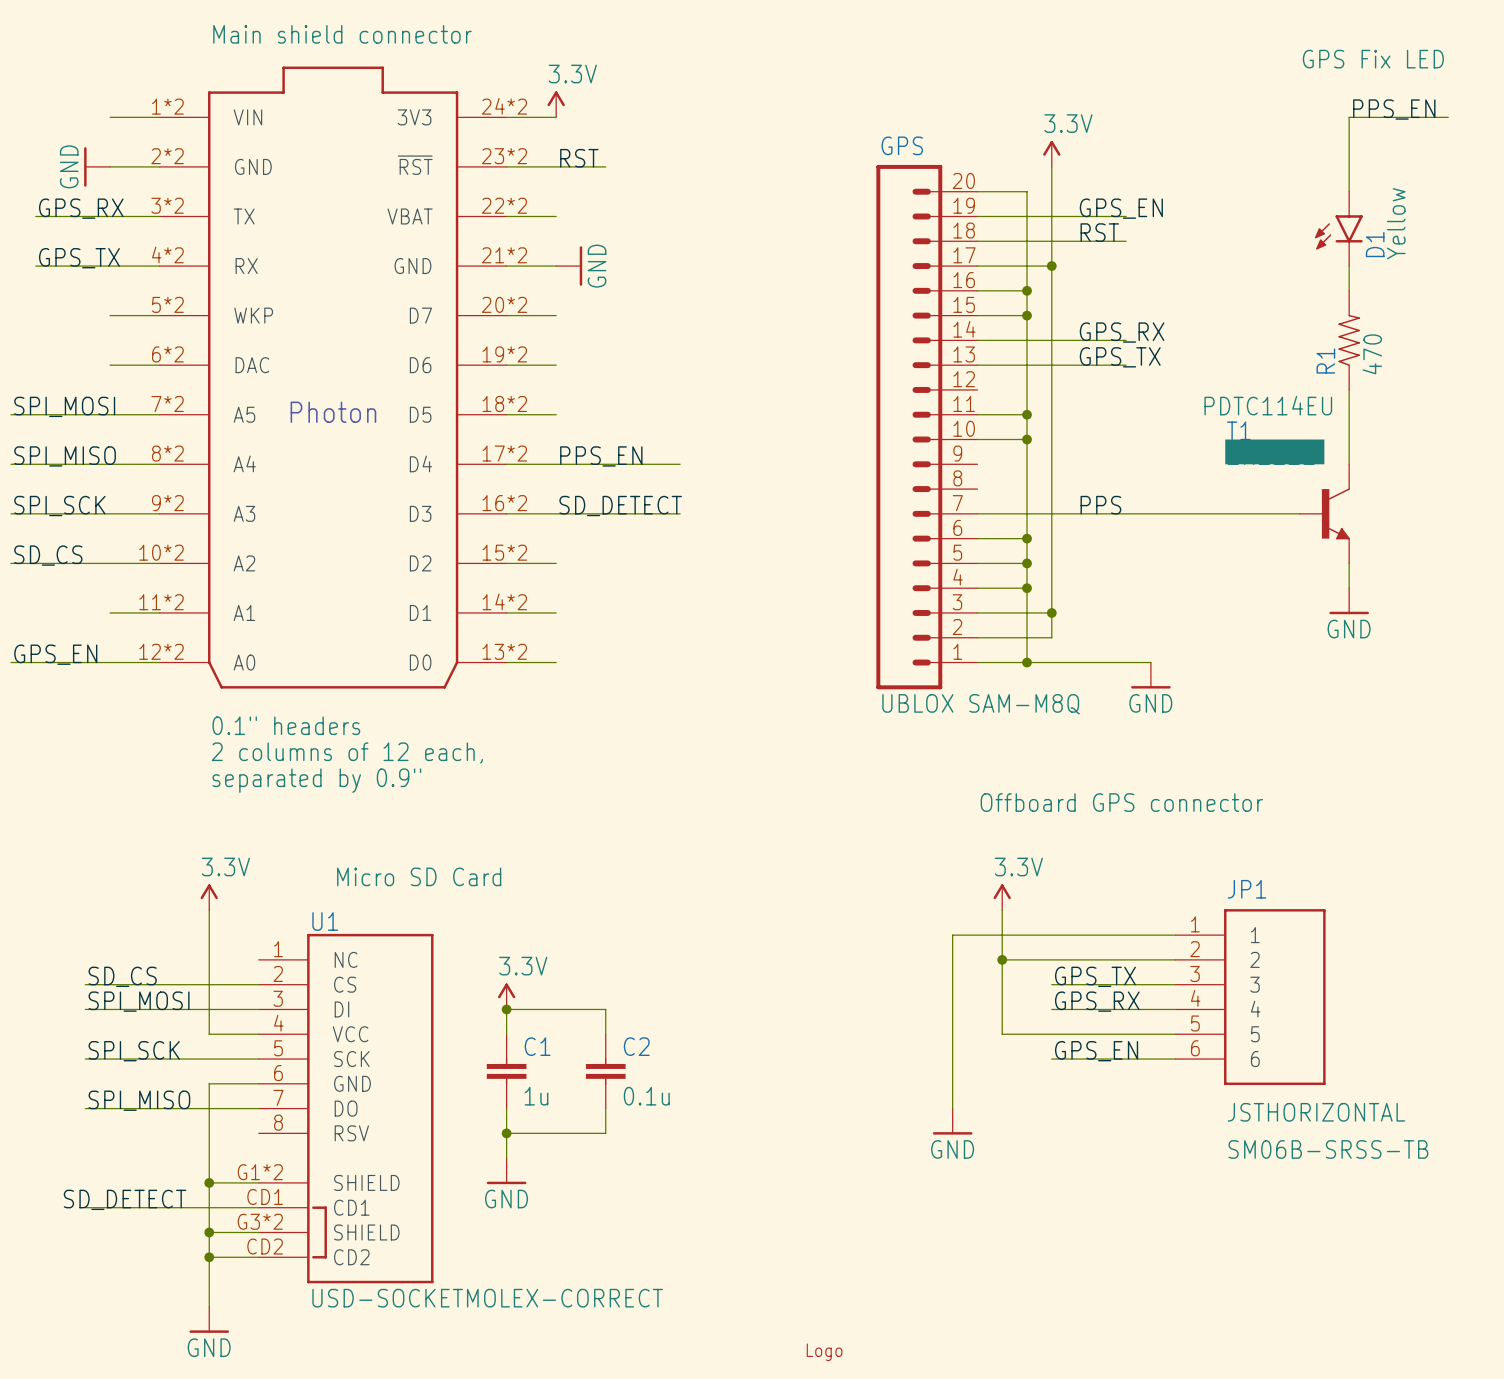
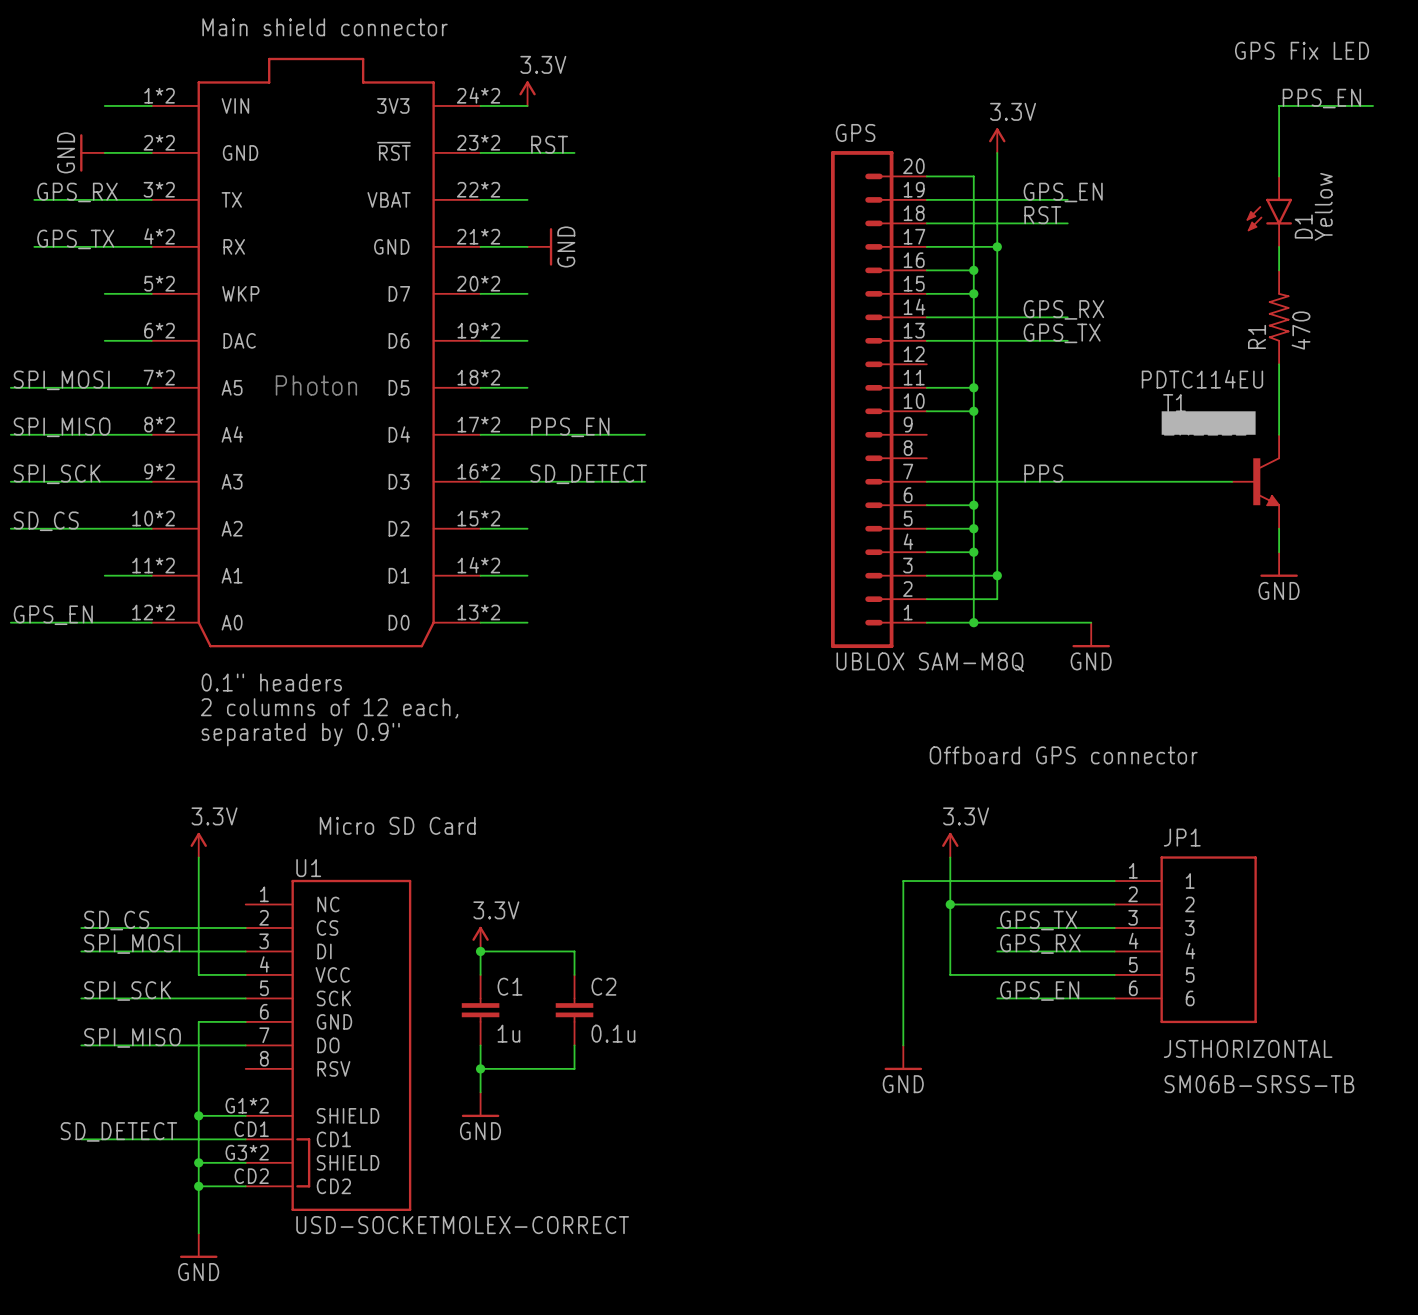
part: (824, 1352) -> none

